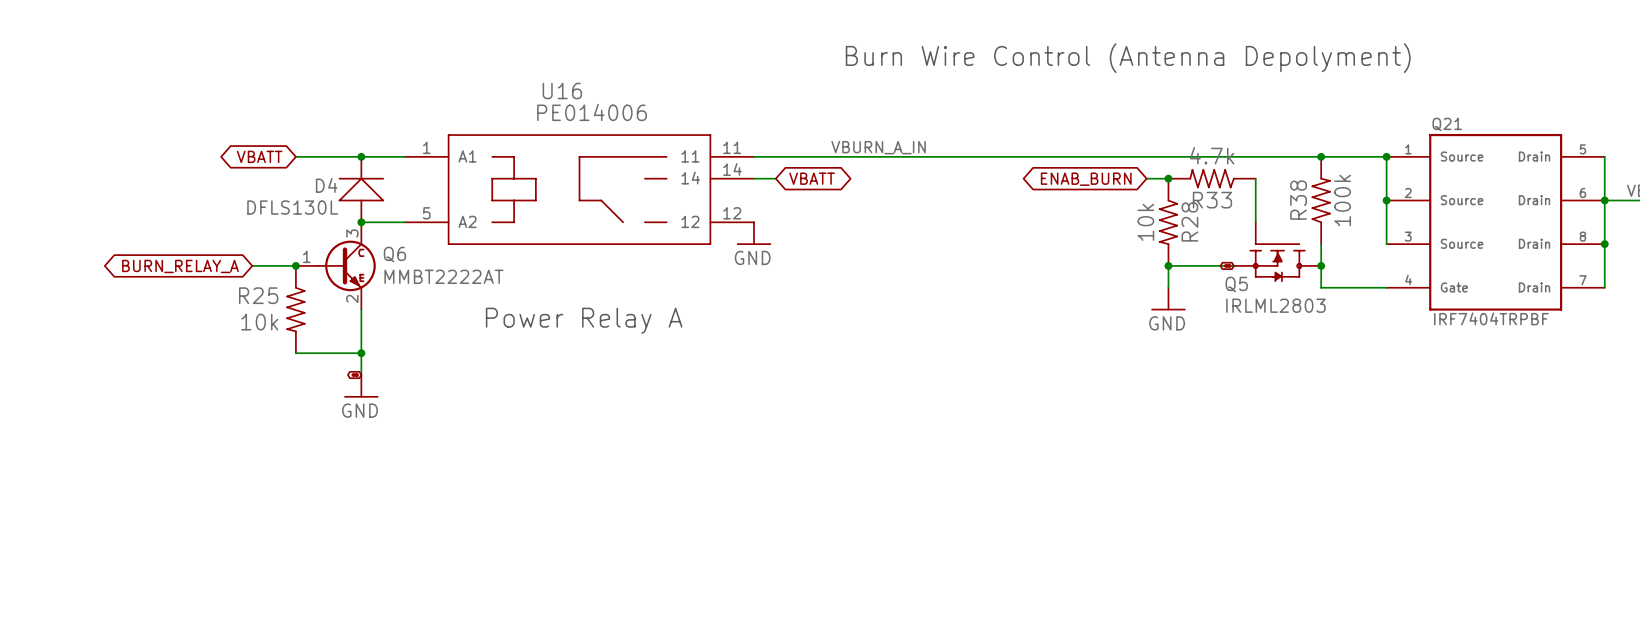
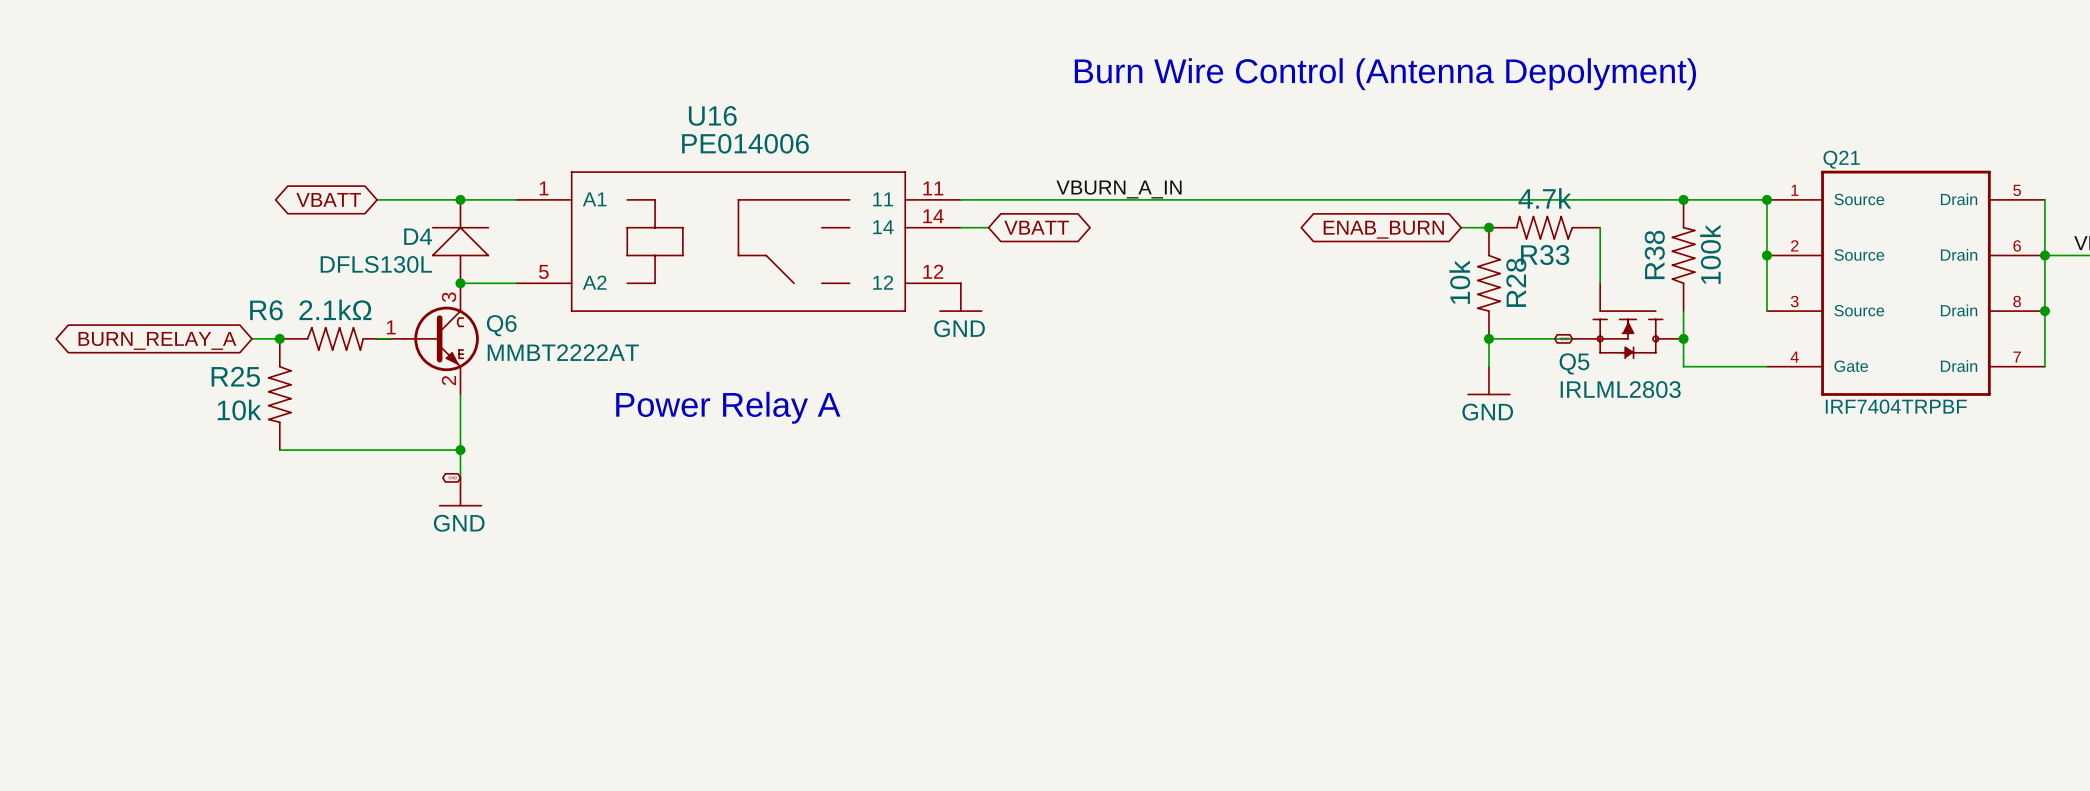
wire: none -> (252, 338) (279, 338)
junction: none -> (279, 338)
R6: none -> 2.1kΩ (335, 338)
junction: (295, 265) -> none
global label position: BURN_RELAY_A (180, 266) -> BURN_RELAY_A (157, 340)
R25 position: (295, 309) -> (279, 394)
wire: none -> (279, 450) (377, 450)

